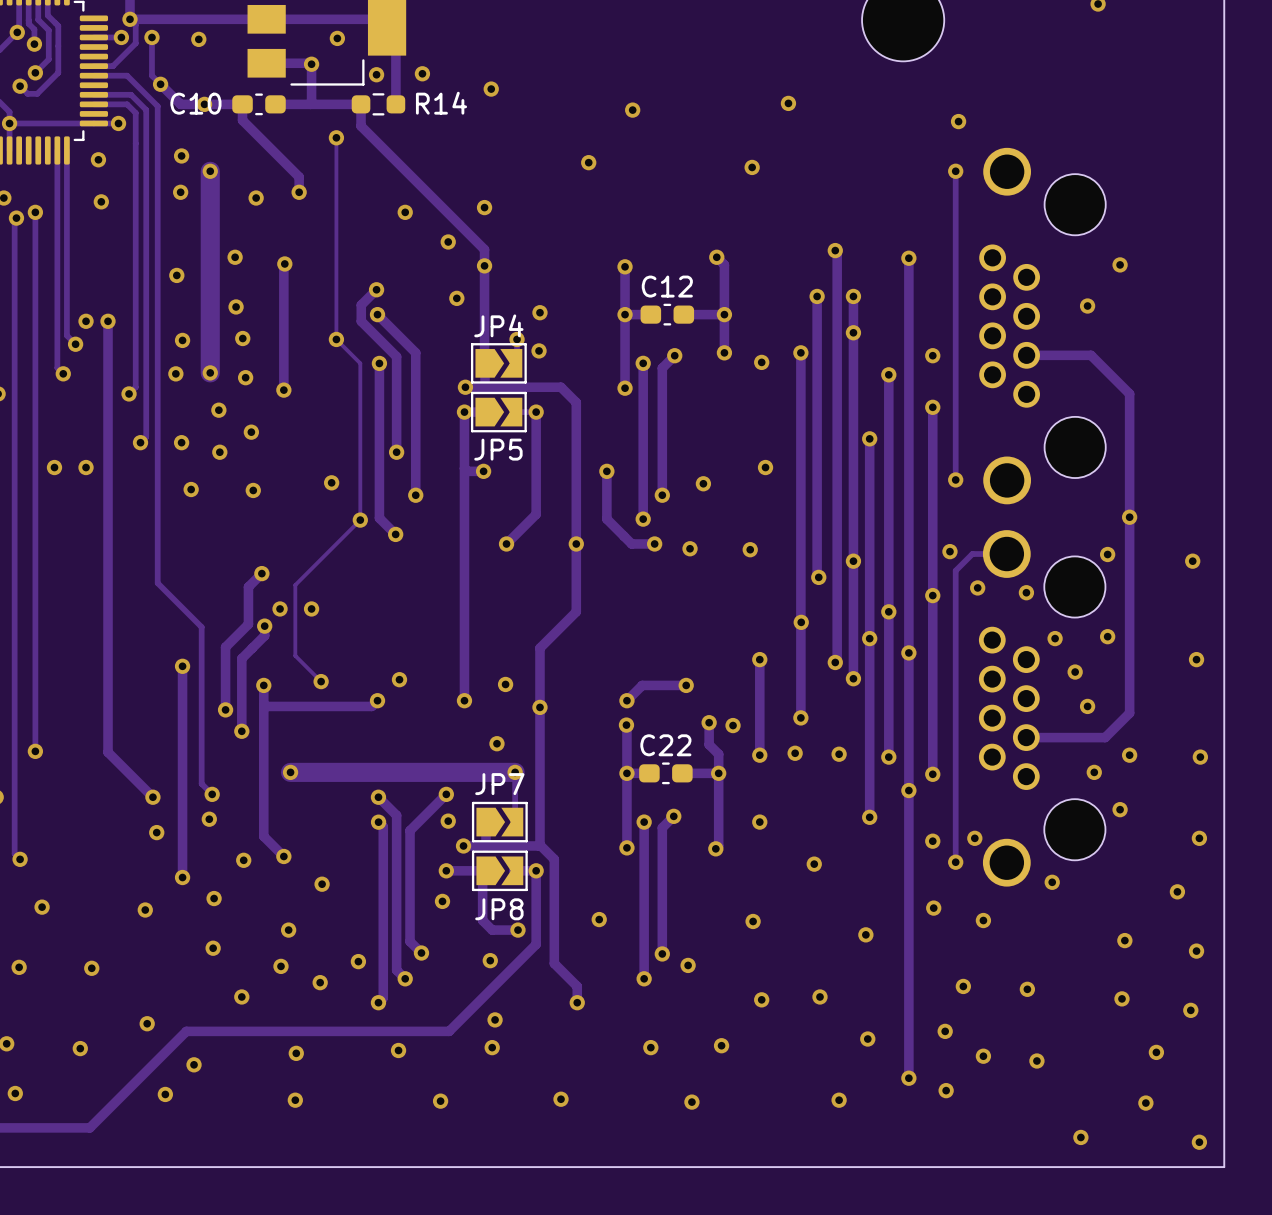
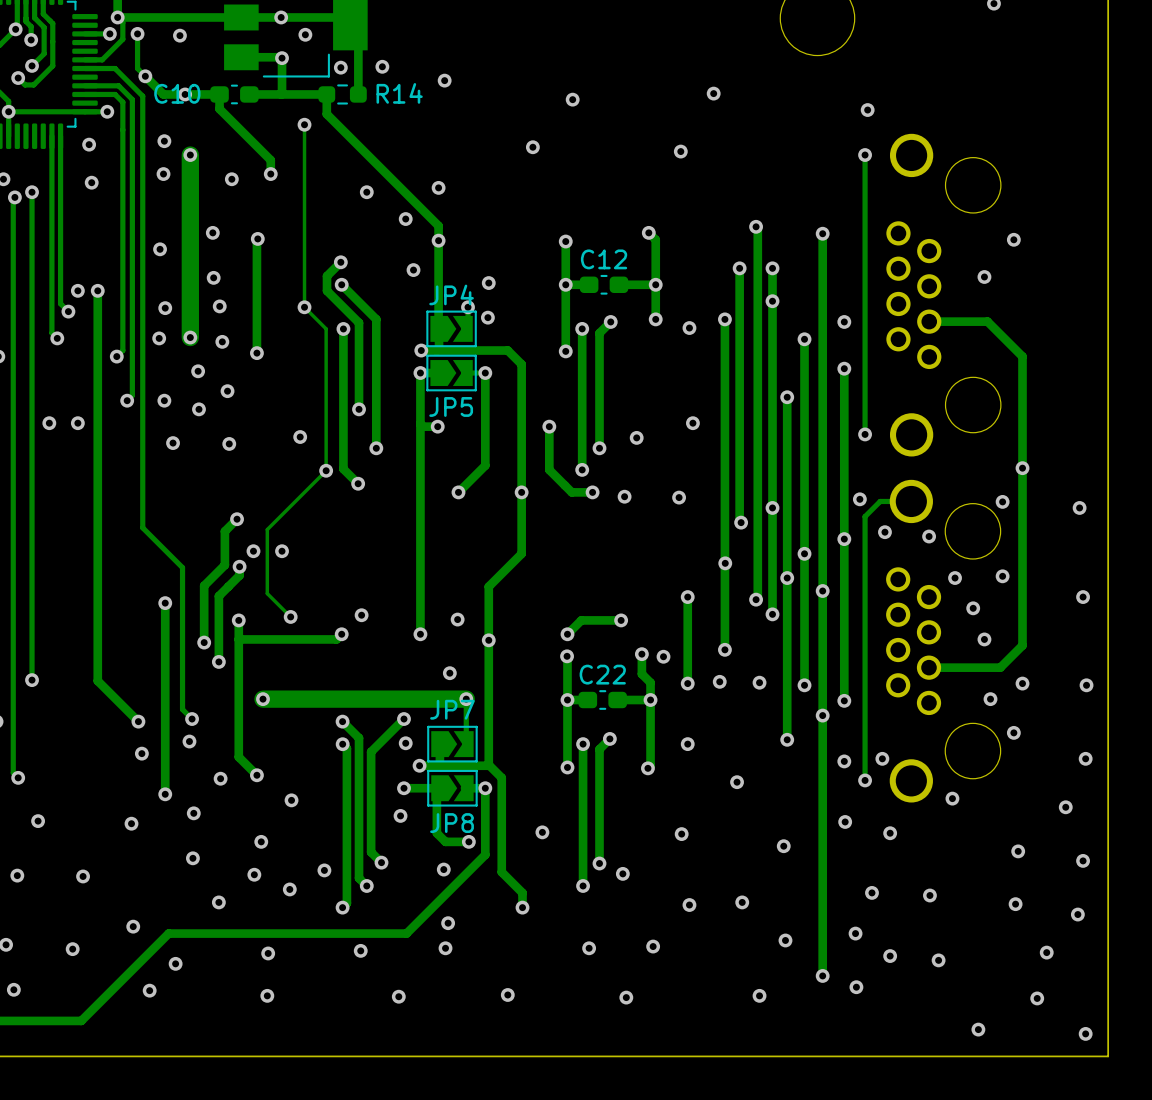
via: none -> (281, 17)

